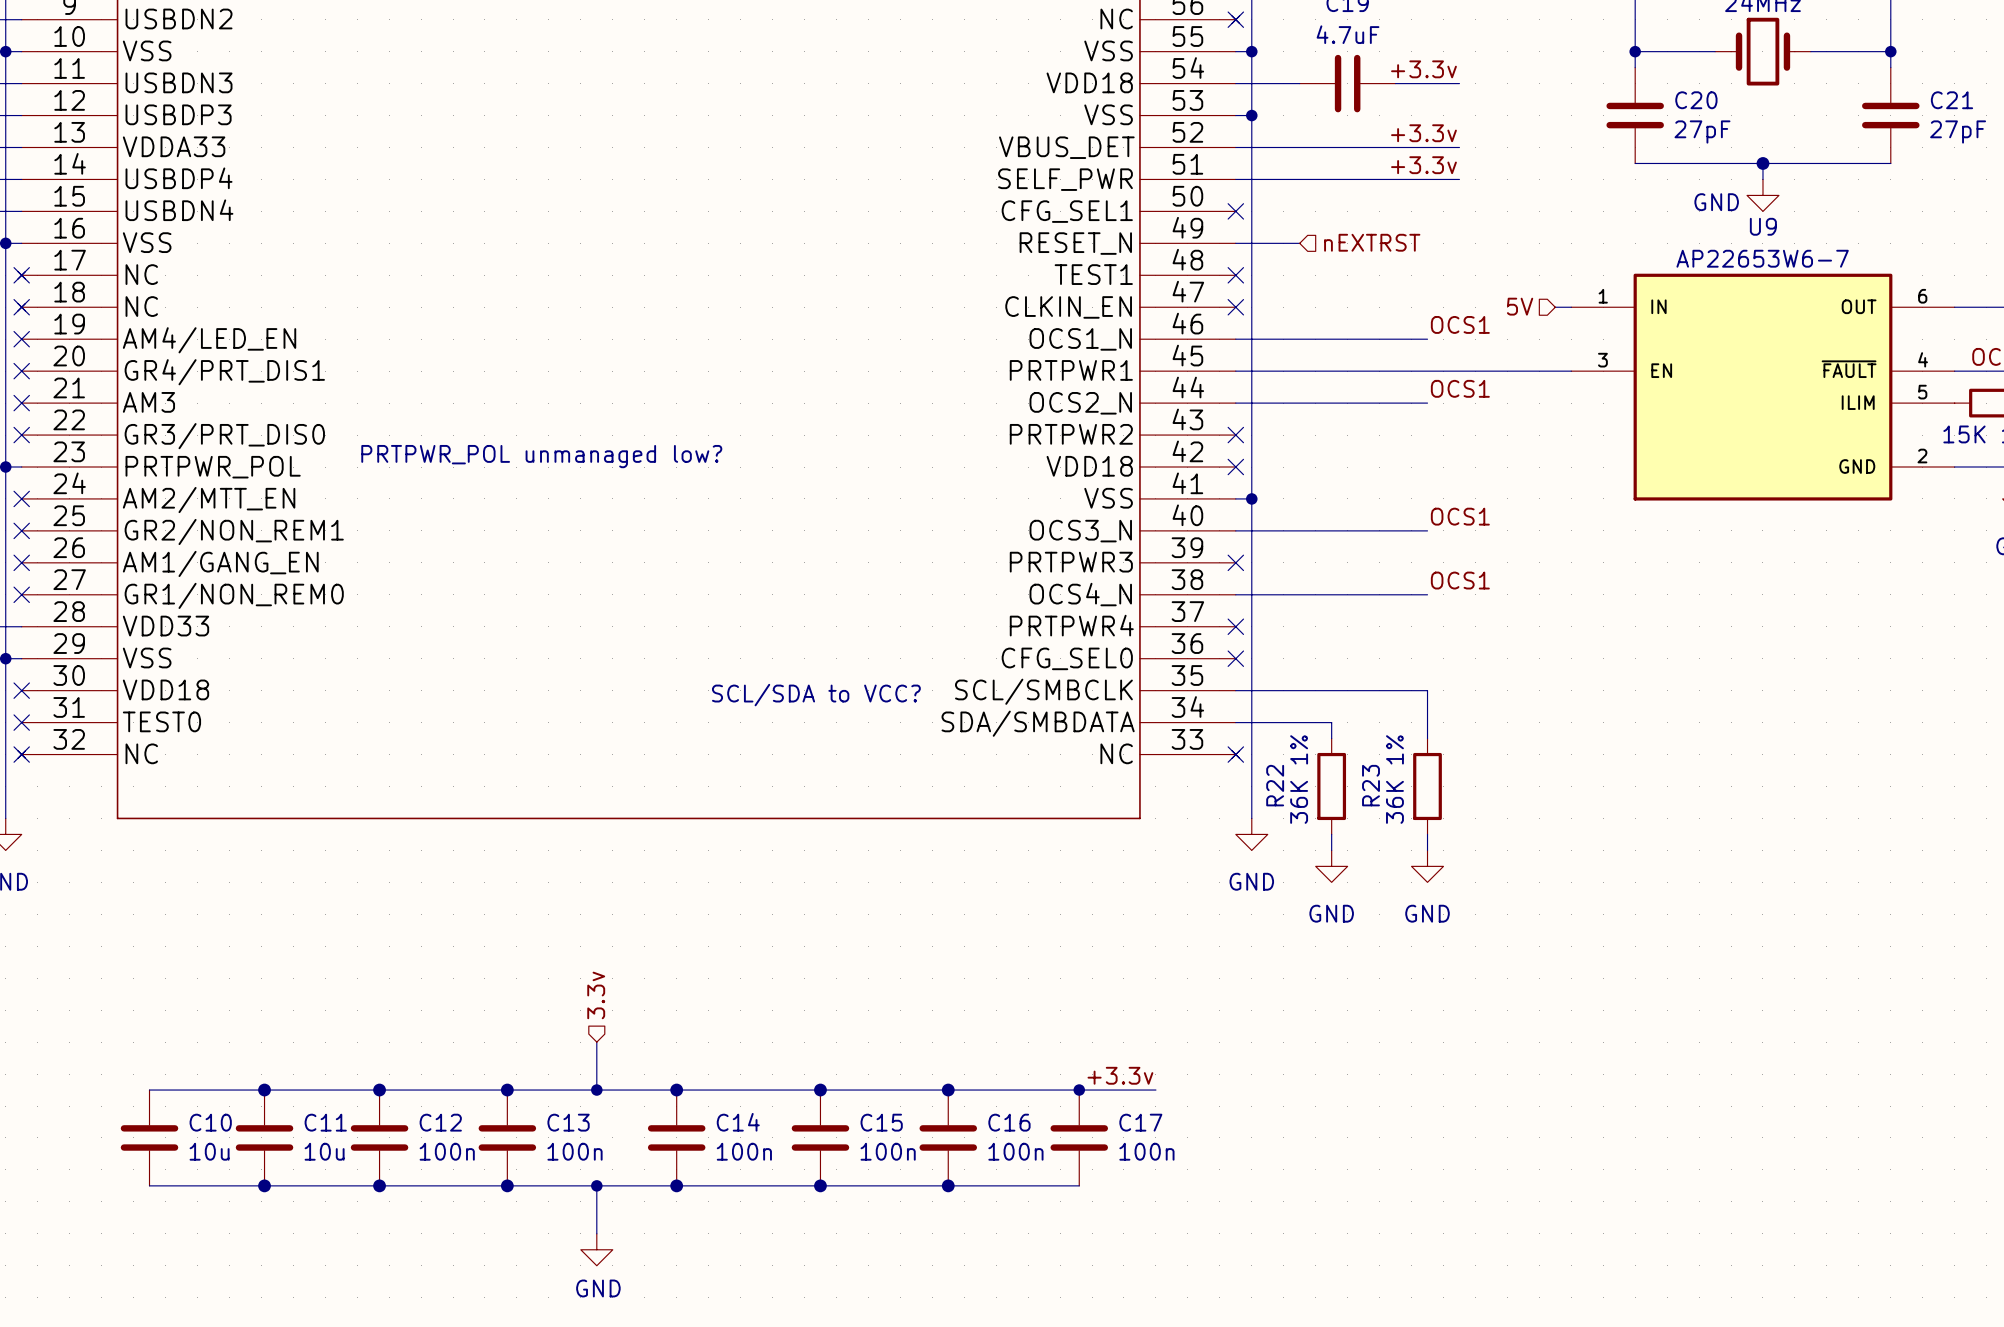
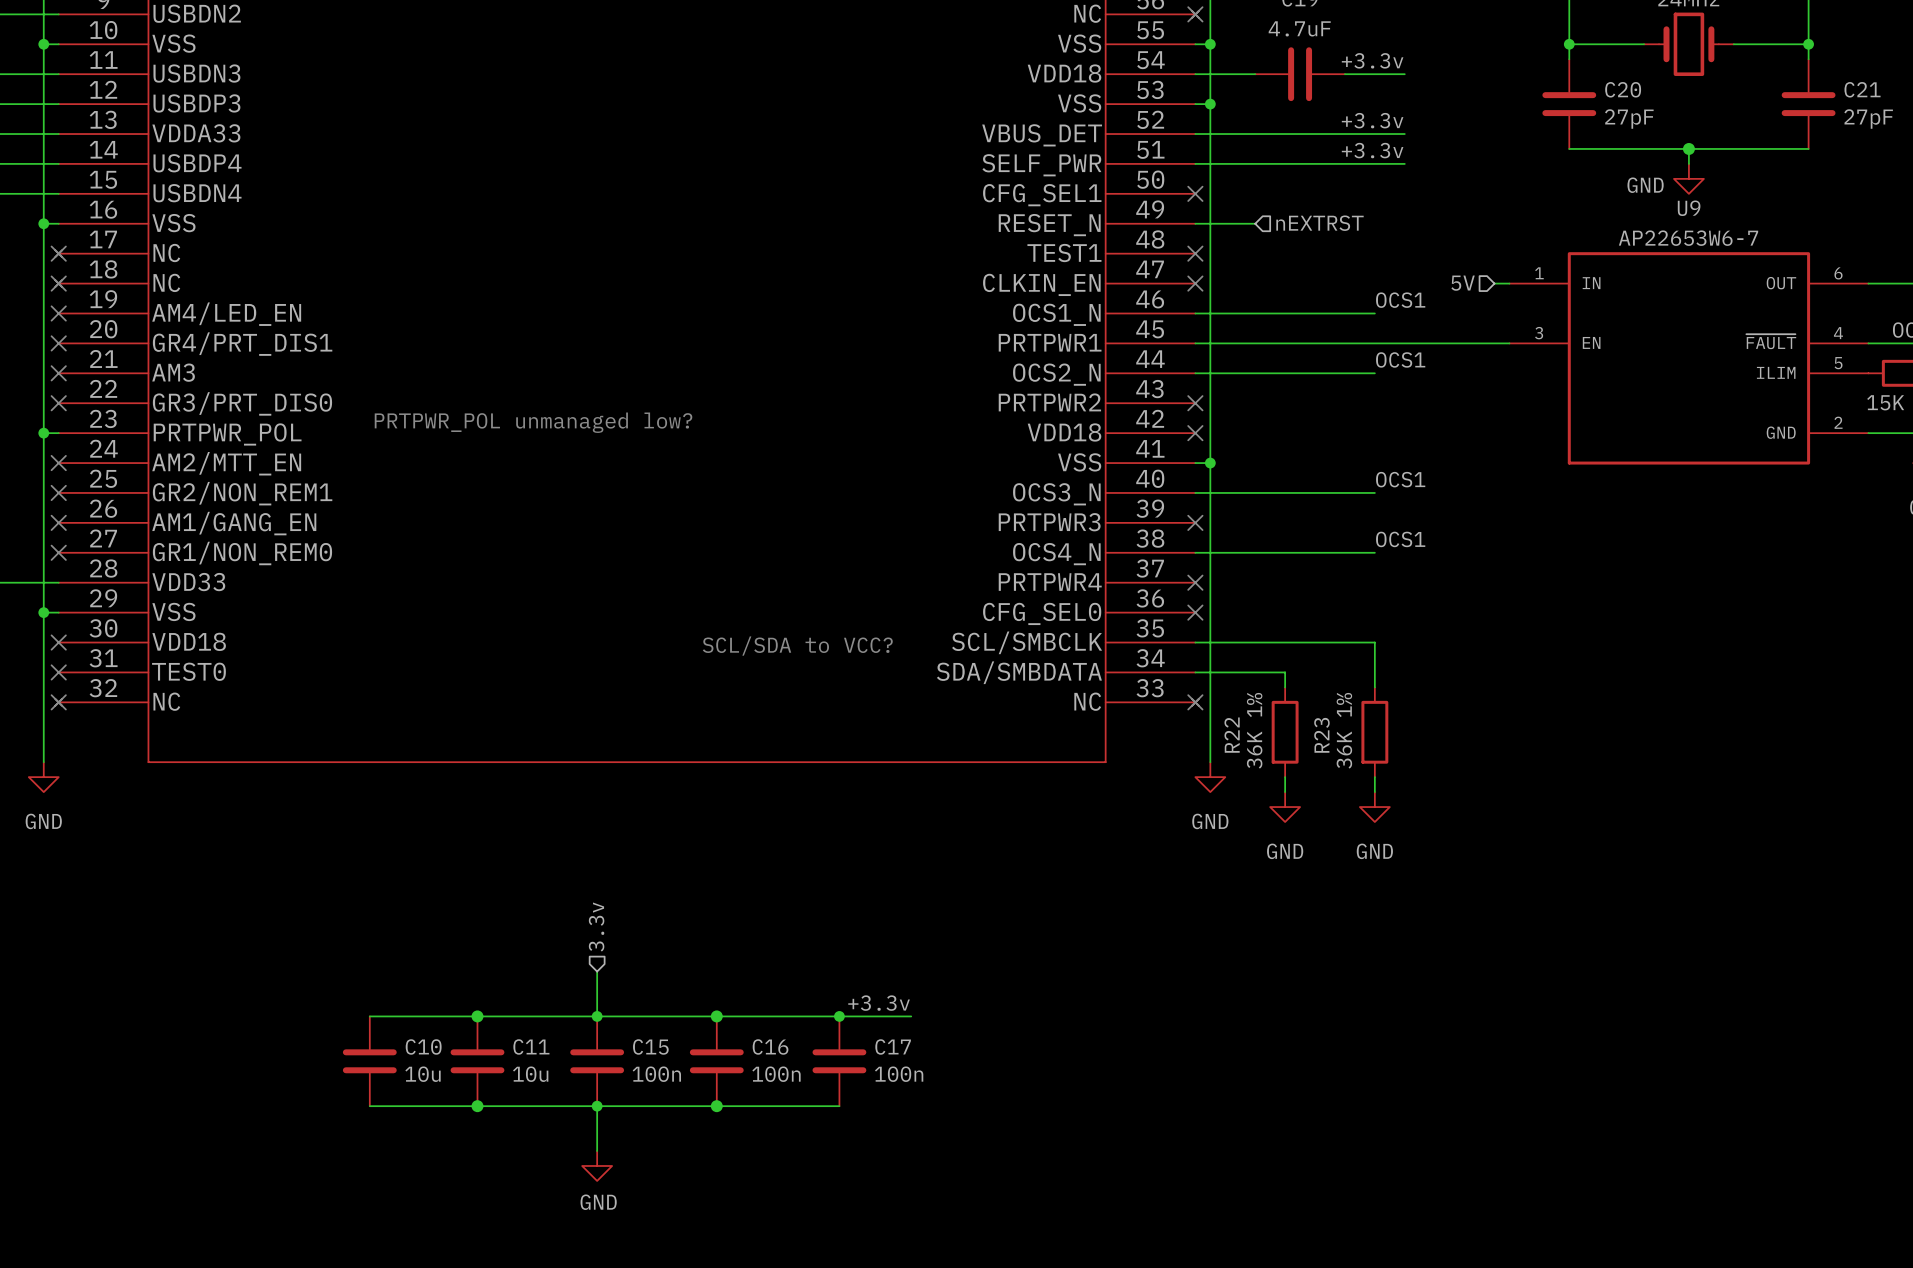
label position: +3.3v (1120, 1075) -> +3.3v (879, 1003)
wire: (149, 1090) (353, 1090) -> none
junction: (264, 1090) -> none
junction: (379, 1090) -> none
junction position: (507, 1090) -> (477, 1016)
junction: (676, 1090) -> none
junction: none -> (716, 1016)
junction: (820, 1090) -> none
junction: none -> (839, 1016)
wire: (932, 1090) (1155, 1090) -> none
junction: (948, 1090) -> none
junction: (1079, 1090) -> none
C10 position: (149, 1137) -> (369, 1061)
C11 position: (264, 1137) -> (477, 1061)
C12: 100n (379, 1137) -> none
C13: 100n (507, 1137) -> none
C14: 100n (676, 1137) -> none
C15 position: (820, 1137) -> (597, 1061)
C16 position: (948, 1137) -> (716, 1061)
C17 position: (1079, 1137) -> (839, 1061)
wire: (149, 1185) (353, 1185) -> none
junction: (264, 1185) -> none
junction: (379, 1185) -> none
junction position: (507, 1185) -> (477, 1106)
junction: (676, 1185) -> none
junction: none -> (716, 1106)
junction: (820, 1185) -> none
wire: (855, 1185) (1079, 1185) -> none
junction: (948, 1185) -> none

